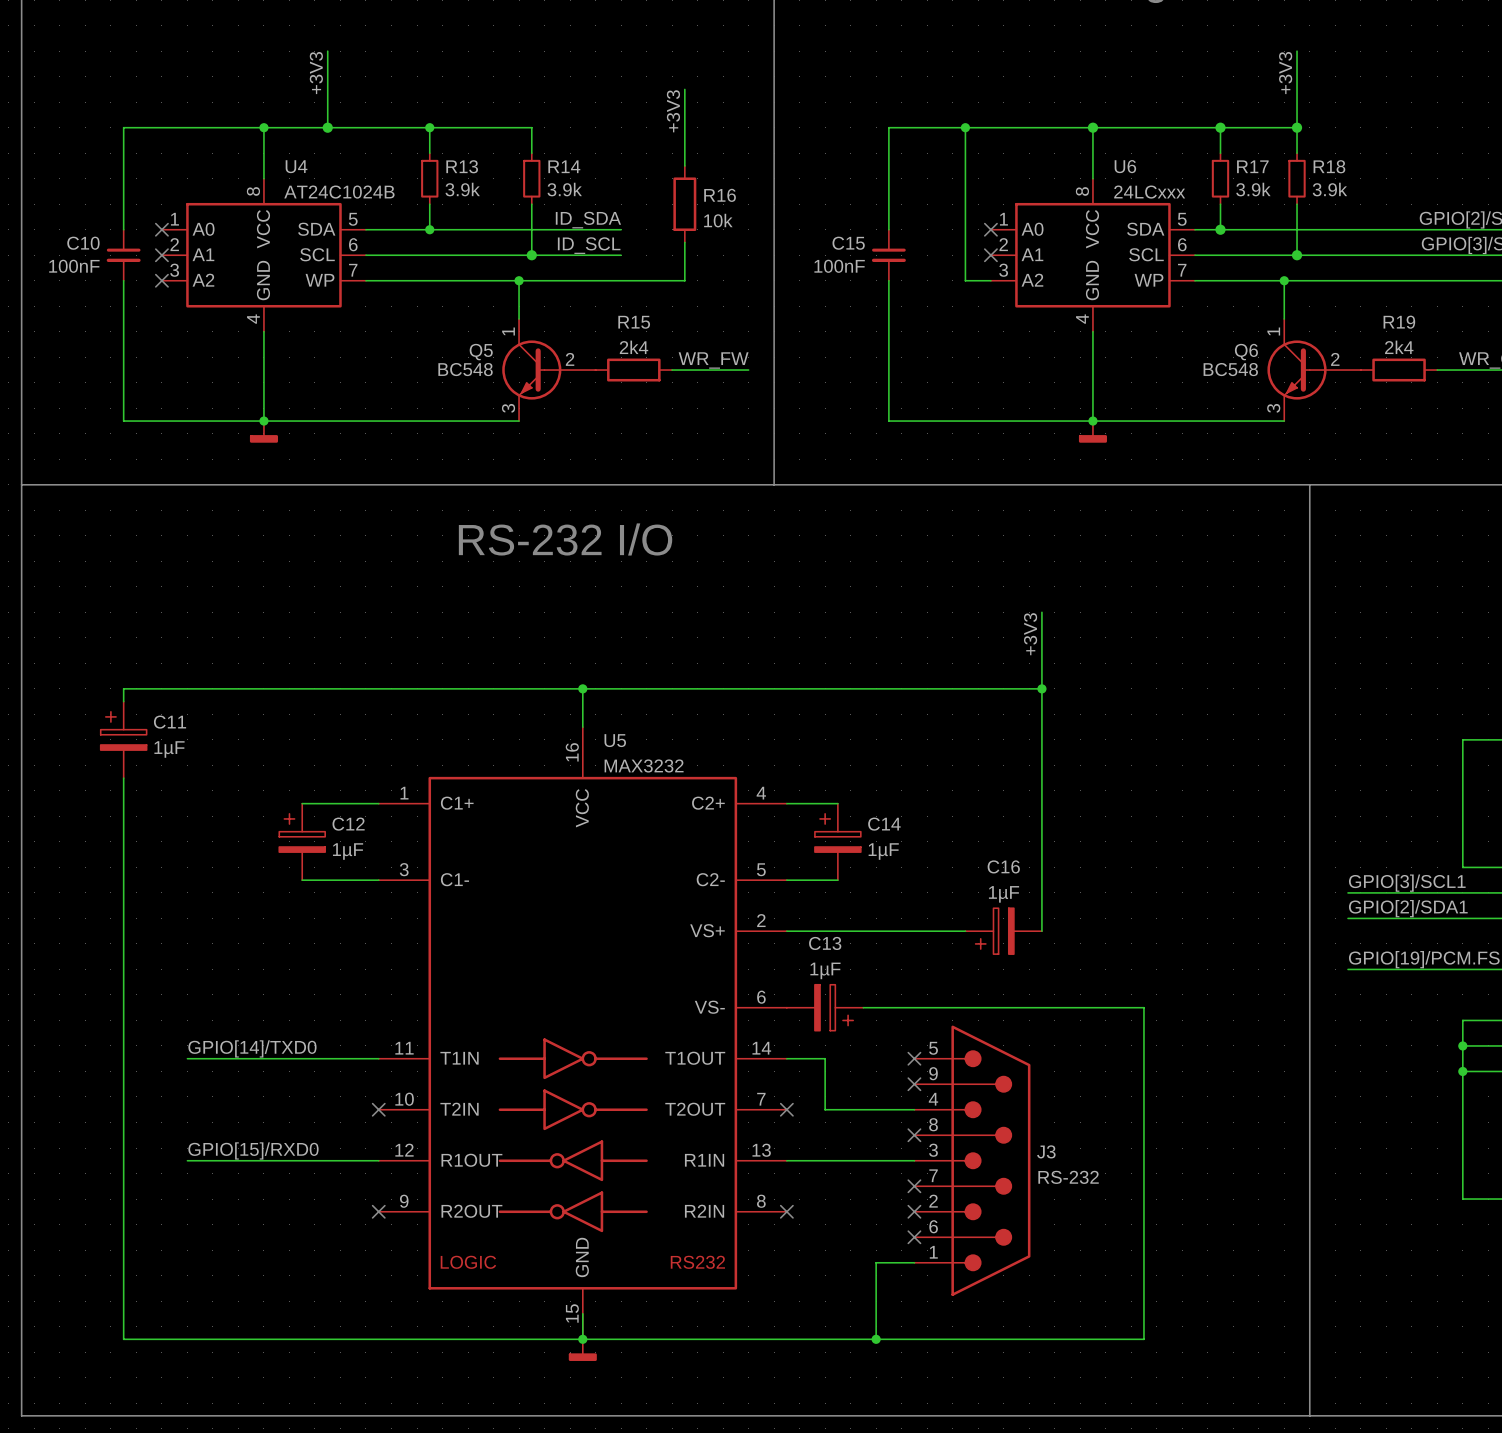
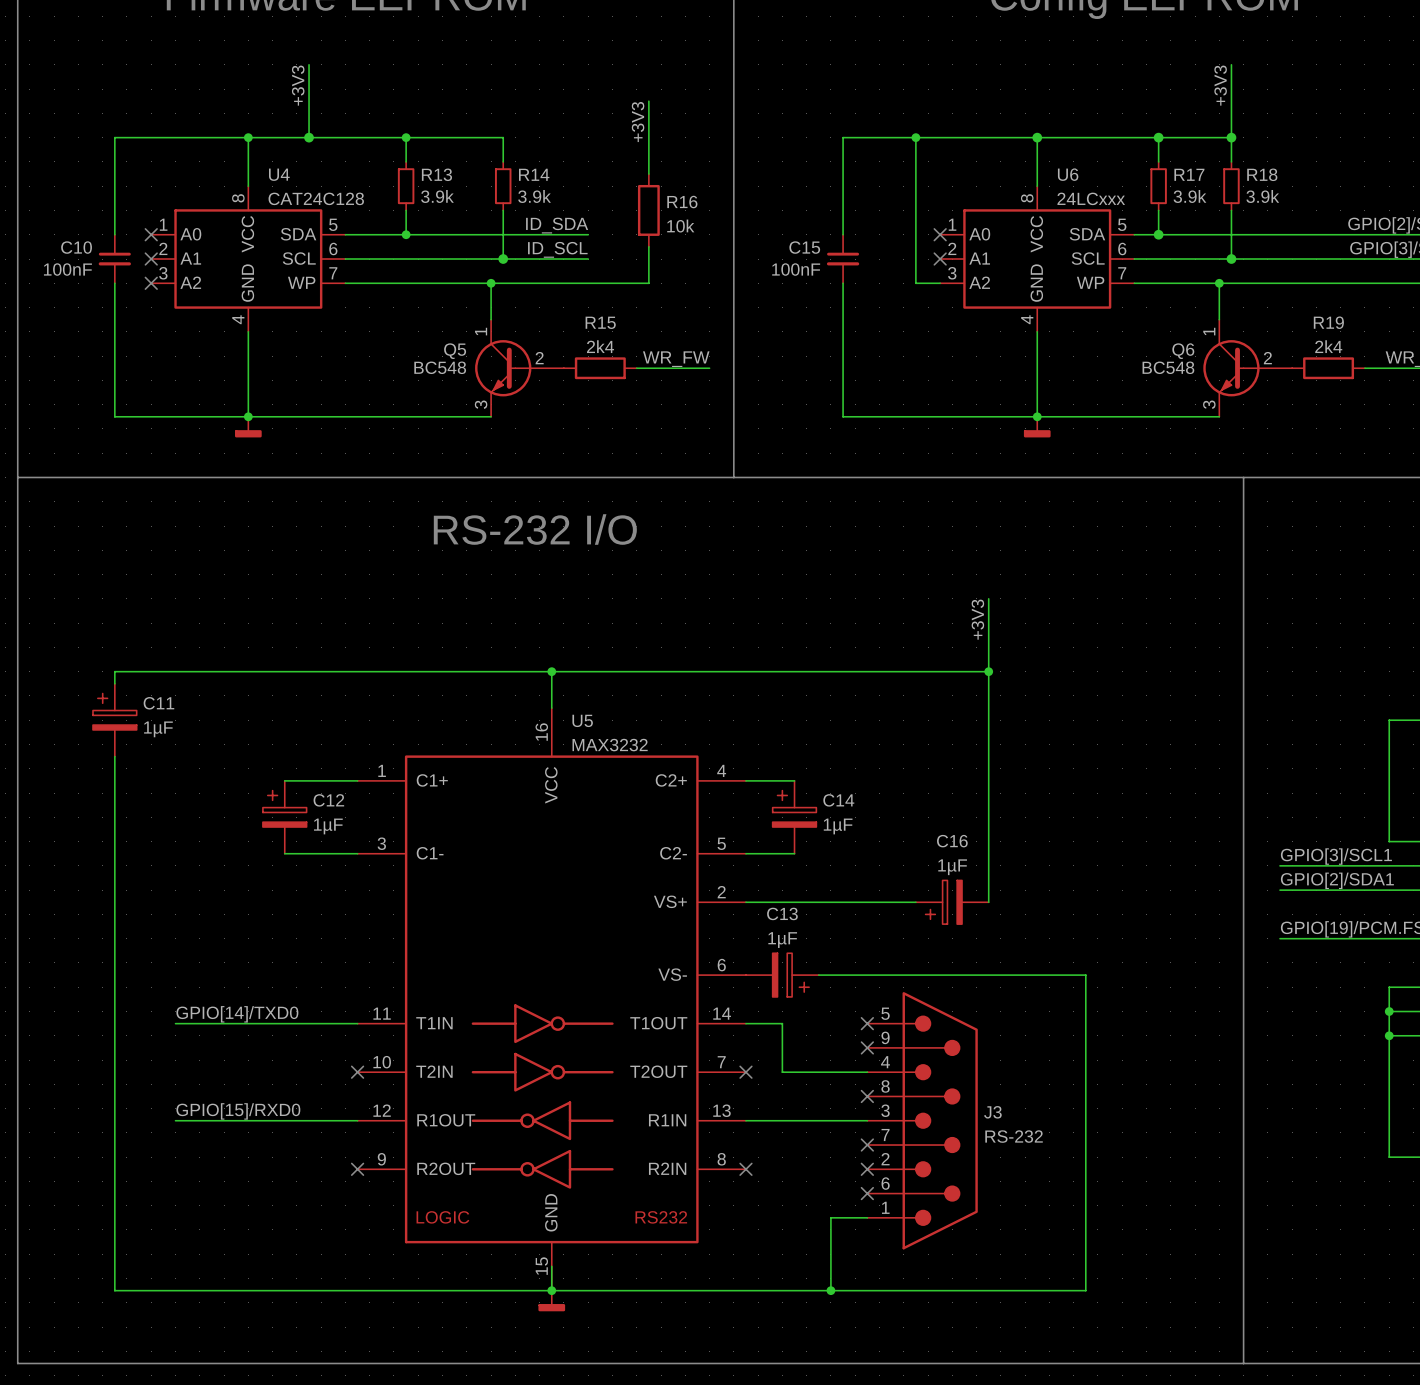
U4 value: AT24C1024B (339, 192) -> CAT24C128 (316, 198)

